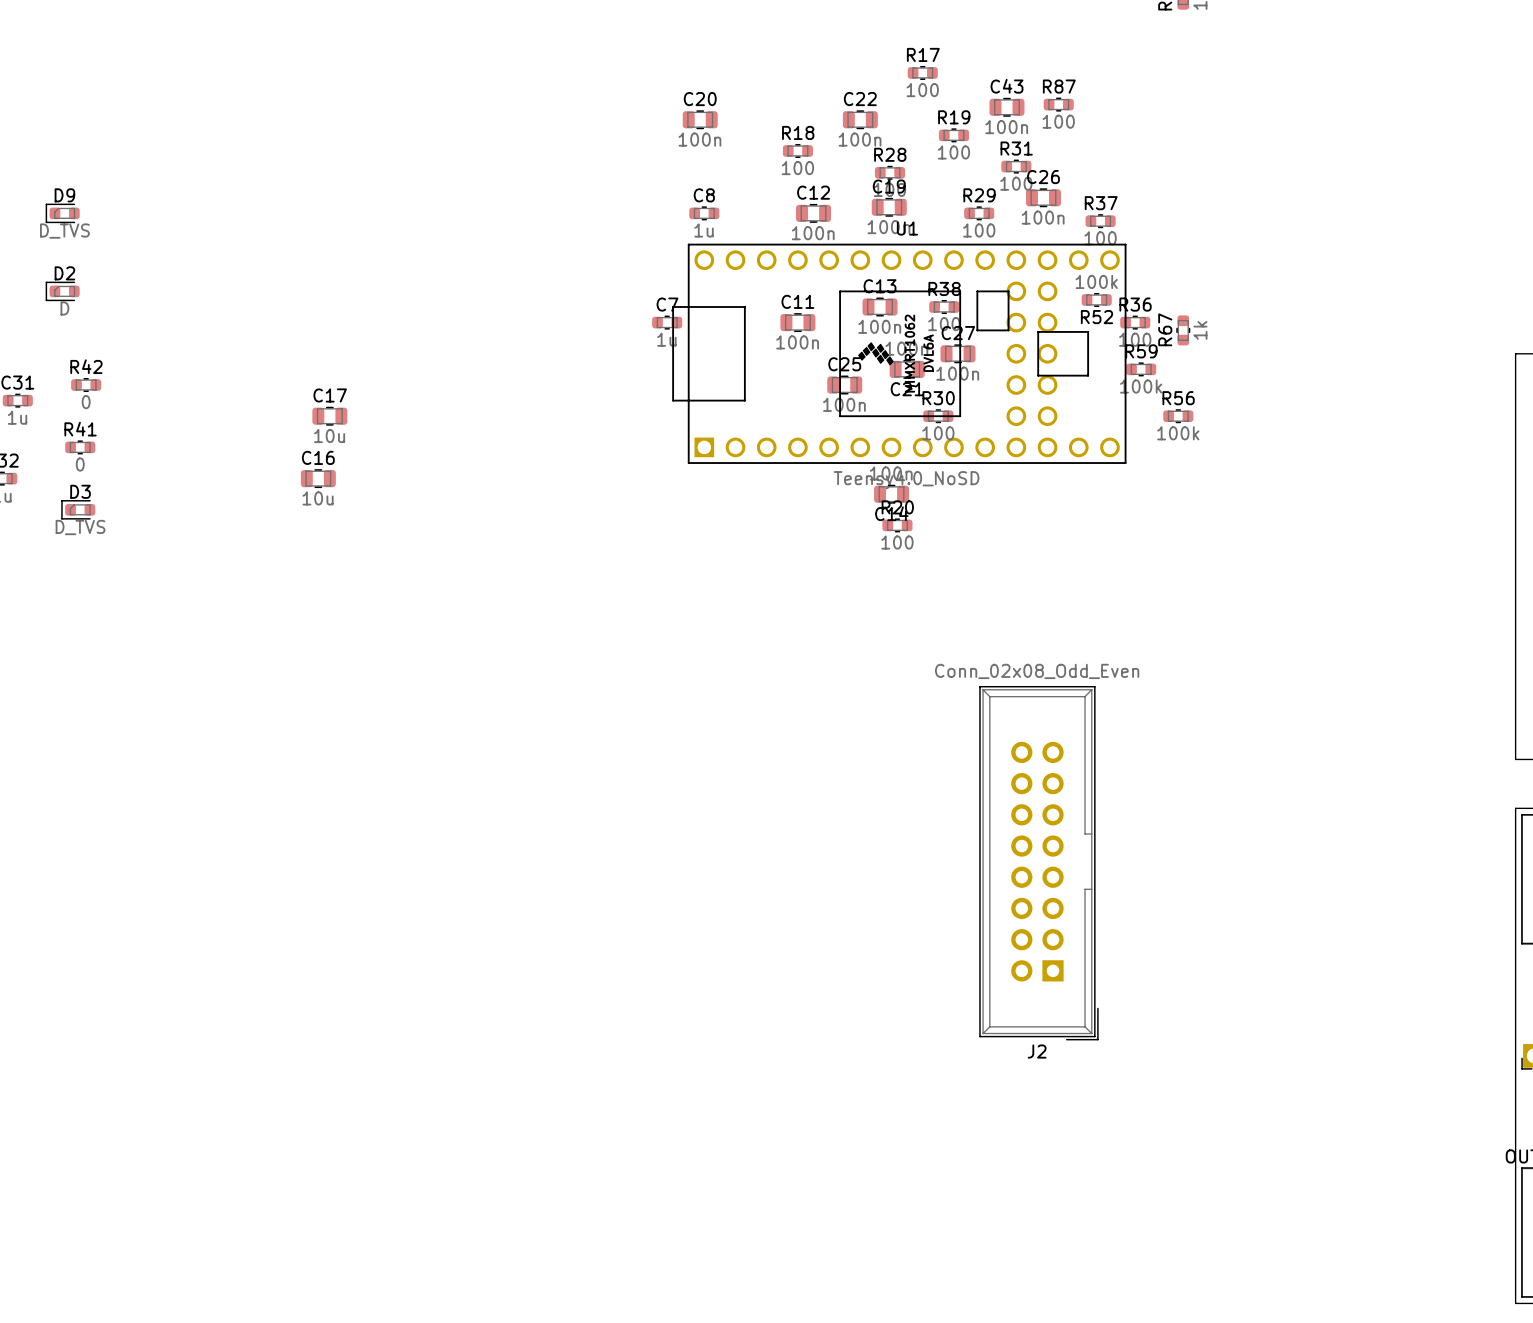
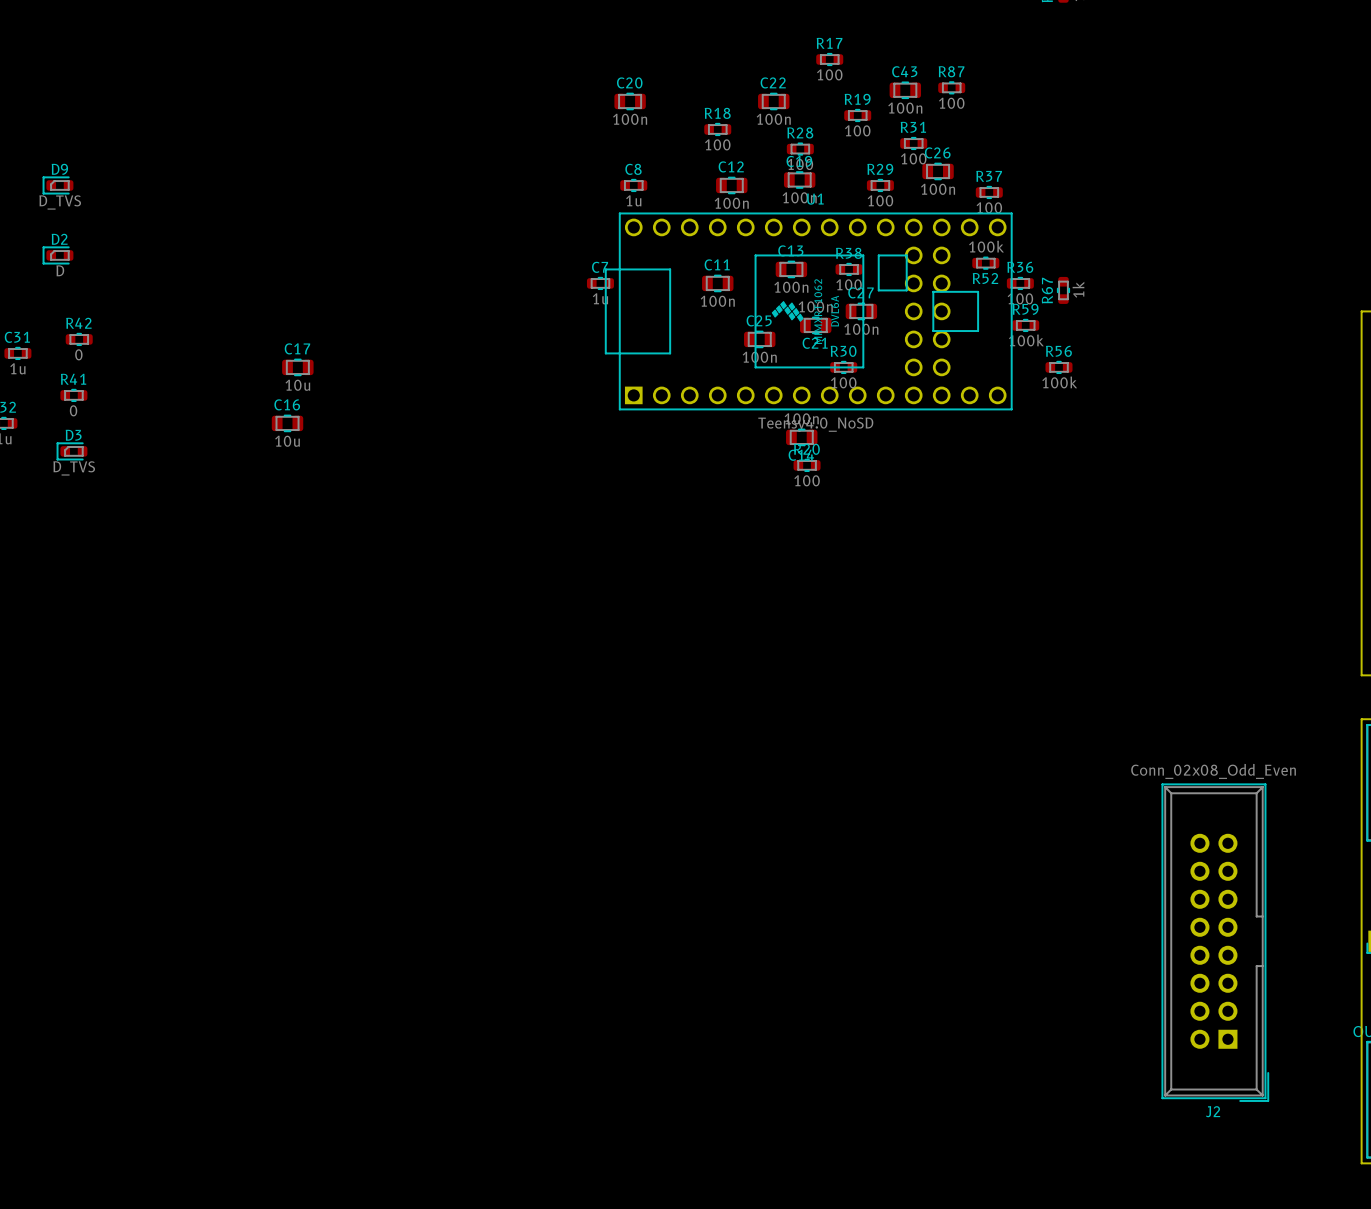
J2 position: (1038, 863) -> (1215, 942)

